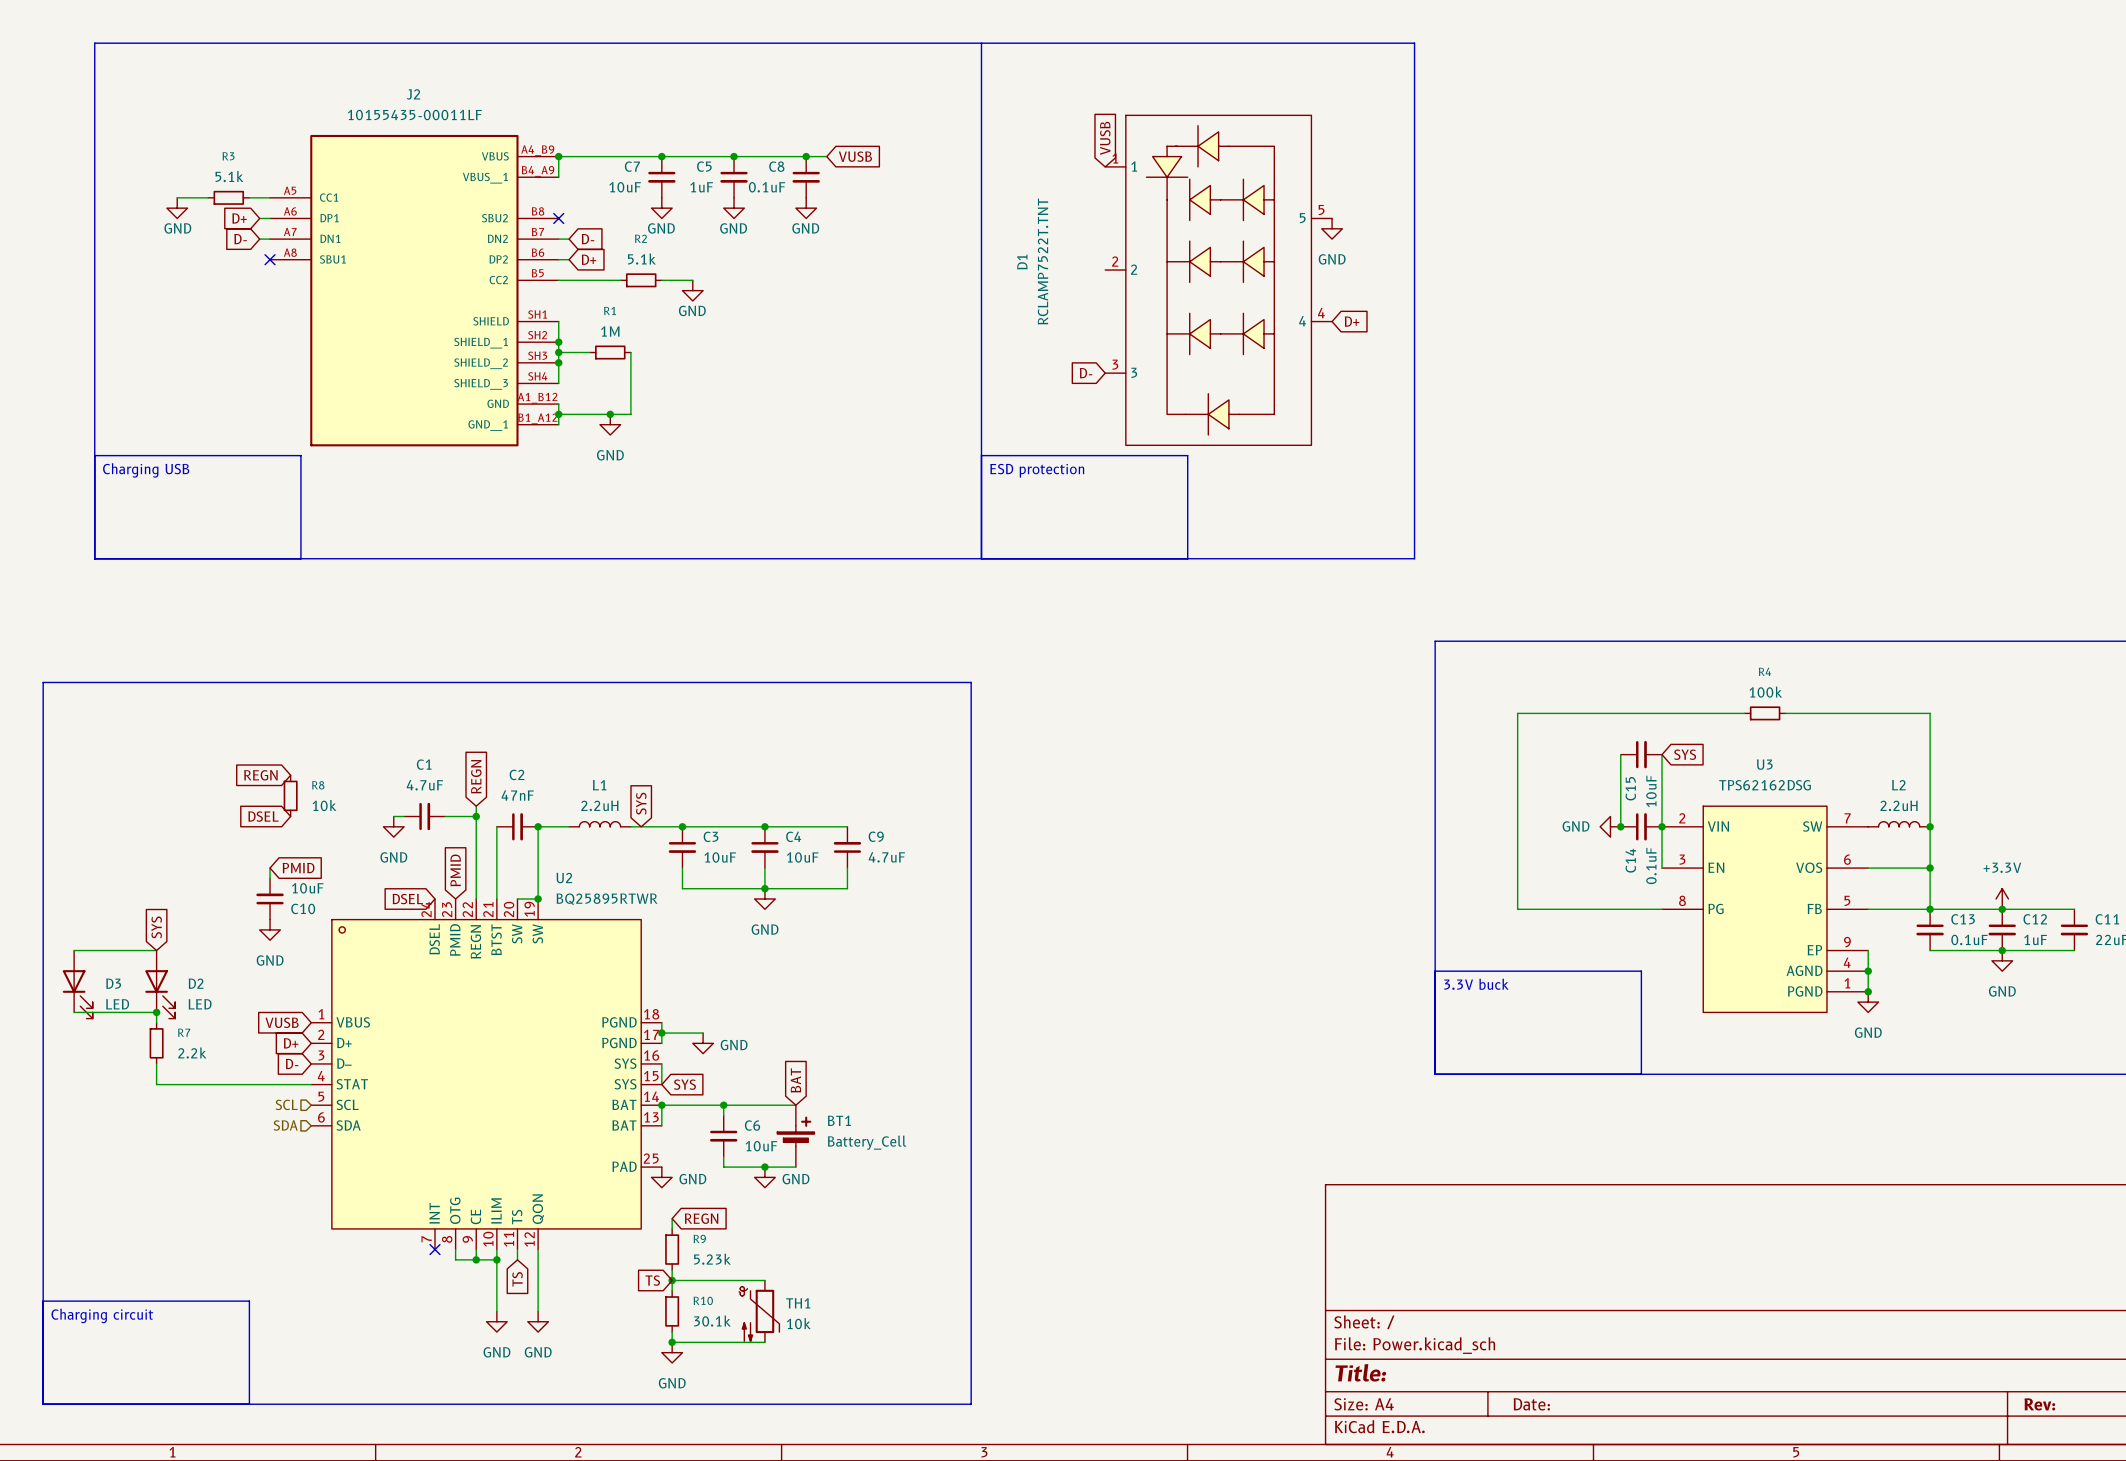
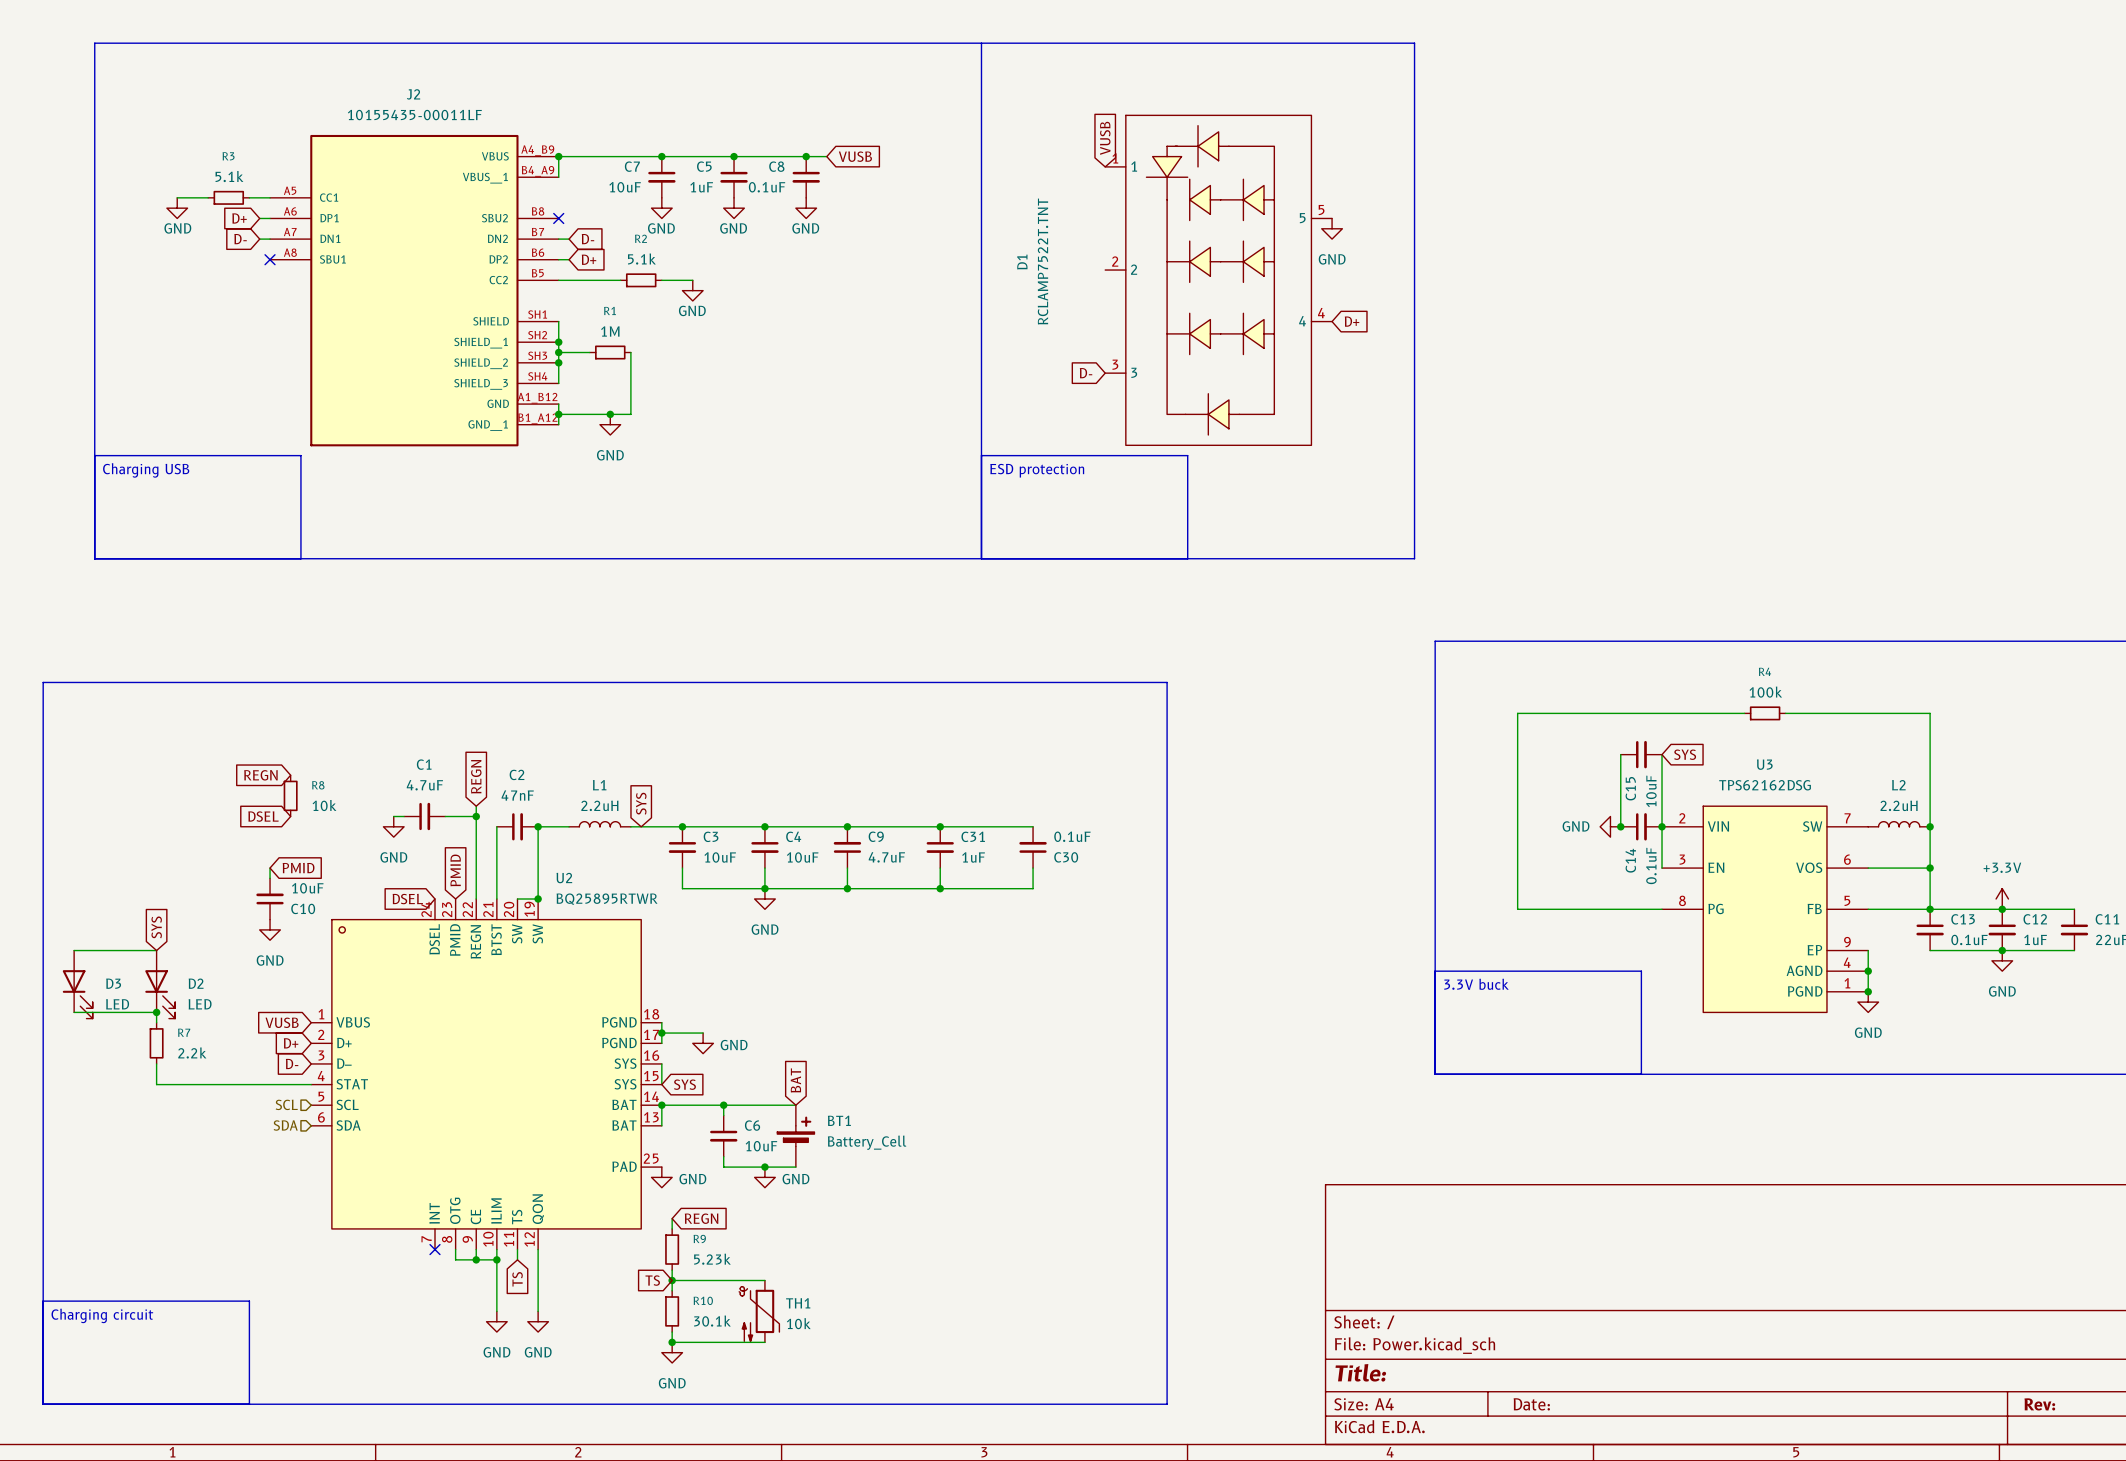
line: (971, 682) (971, 1404) -> (971, 682) (1167, 682) (1167, 1404) (971, 1404)
wire: none -> (847, 826) (1033, 826)
junction: none -> (847, 826)
junction: none -> (940, 826)
C31: none -> 1uF (940, 847)
C30: none -> 0.1uF (1033, 847)
wire: none -> (940, 868) (940, 888)
wire: none -> (1033, 868) (1033, 888) (847, 888)
junction: none -> (847, 888)
junction: none -> (940, 888)

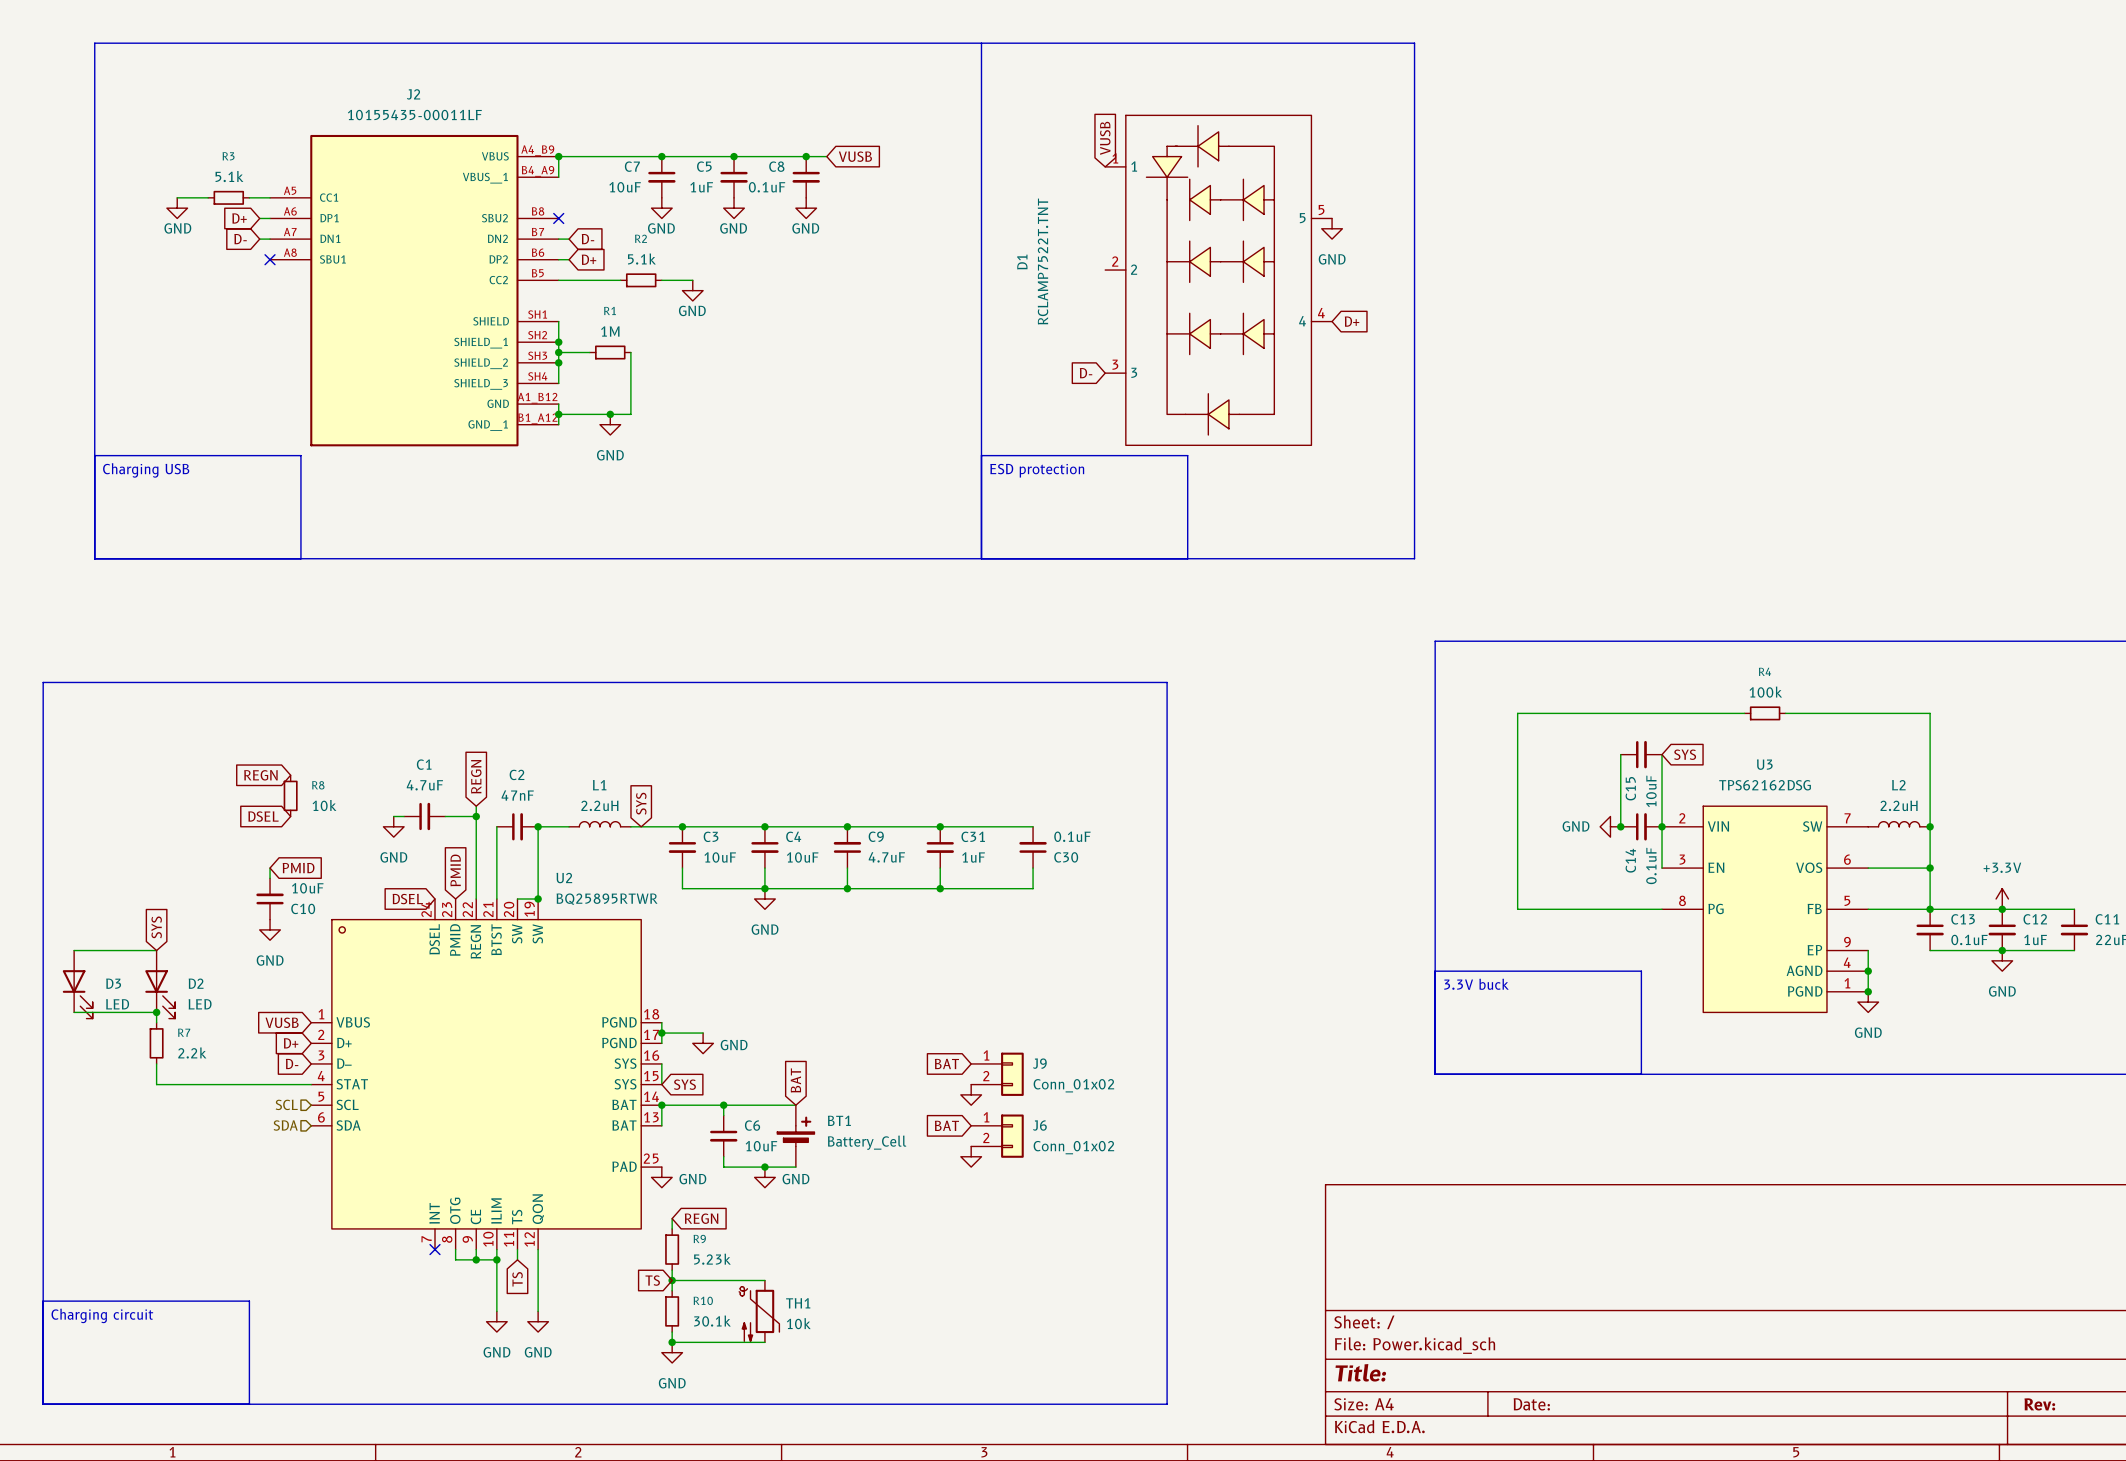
global label: none -> BAT (946, 1063)
J9: none -> Conn_01x02 (997, 1074)
power symbol: none -> (971, 1094)
global label: none -> BAT (946, 1125)
J6: none -> Conn_01x02 (997, 1136)
power symbol: none -> (971, 1156)

